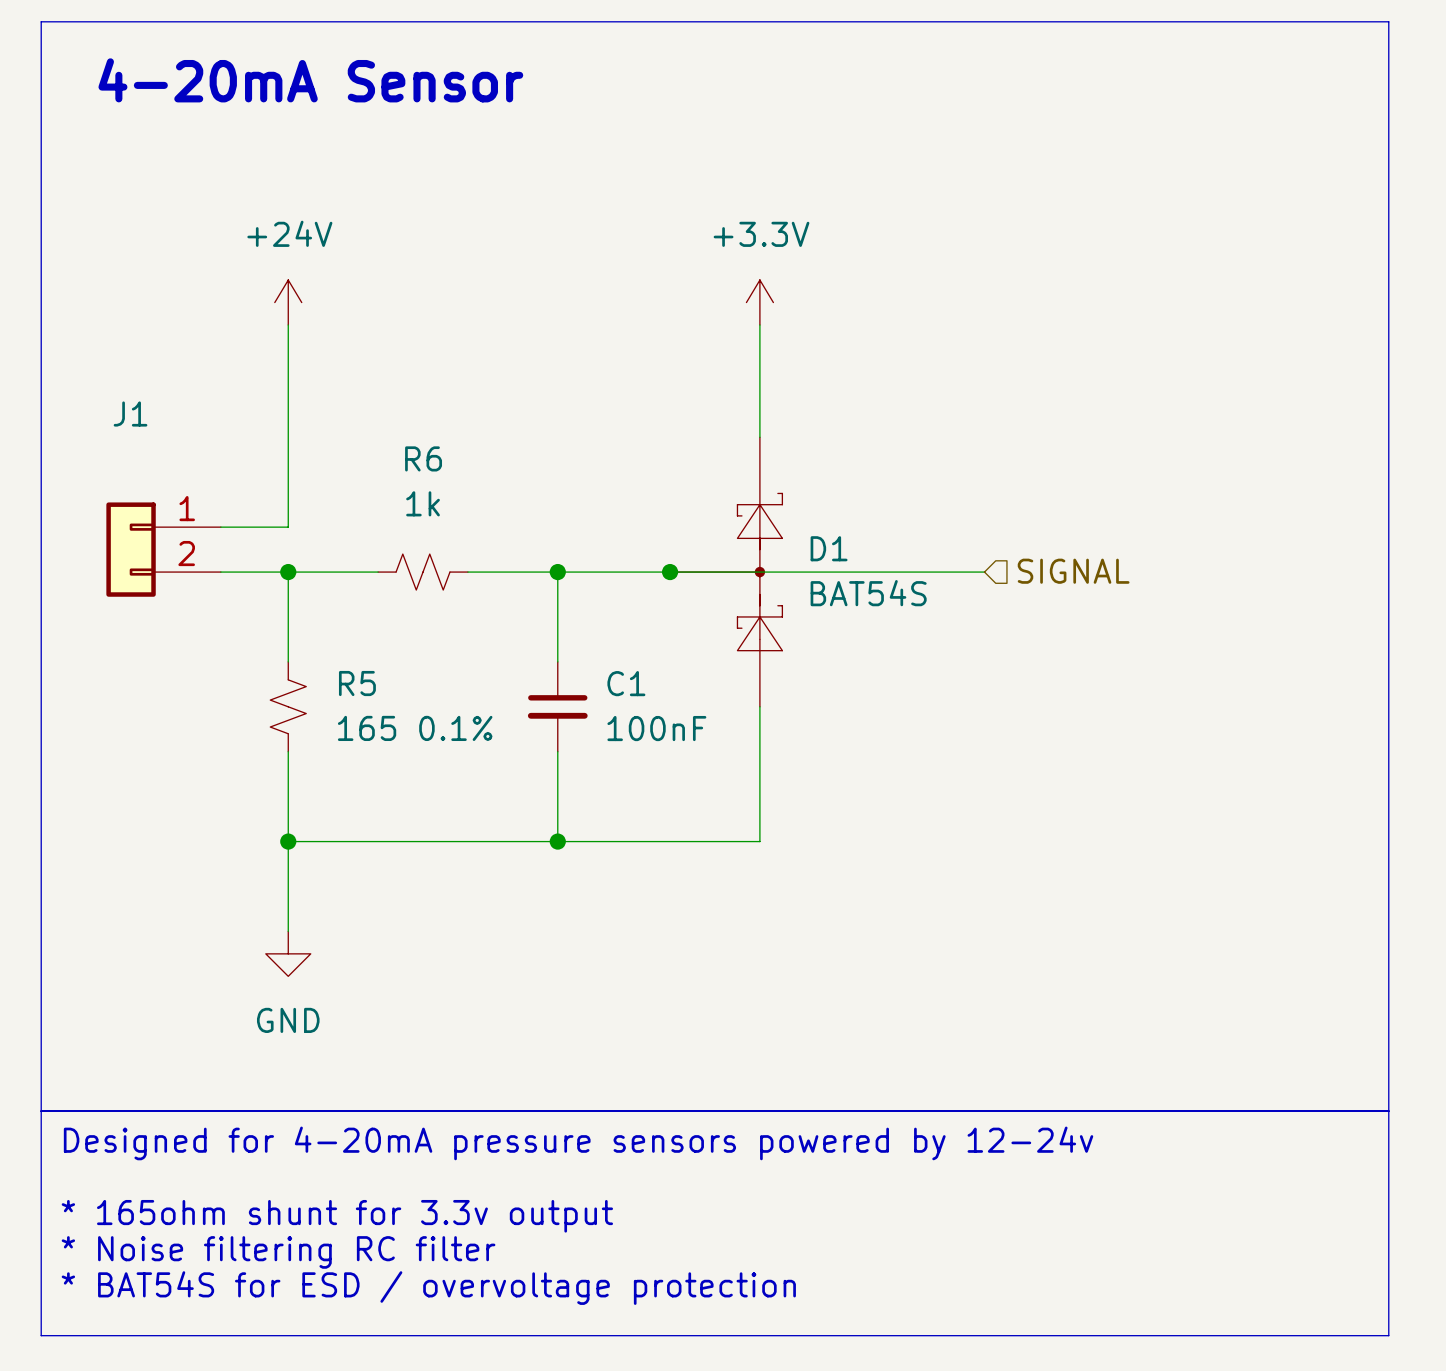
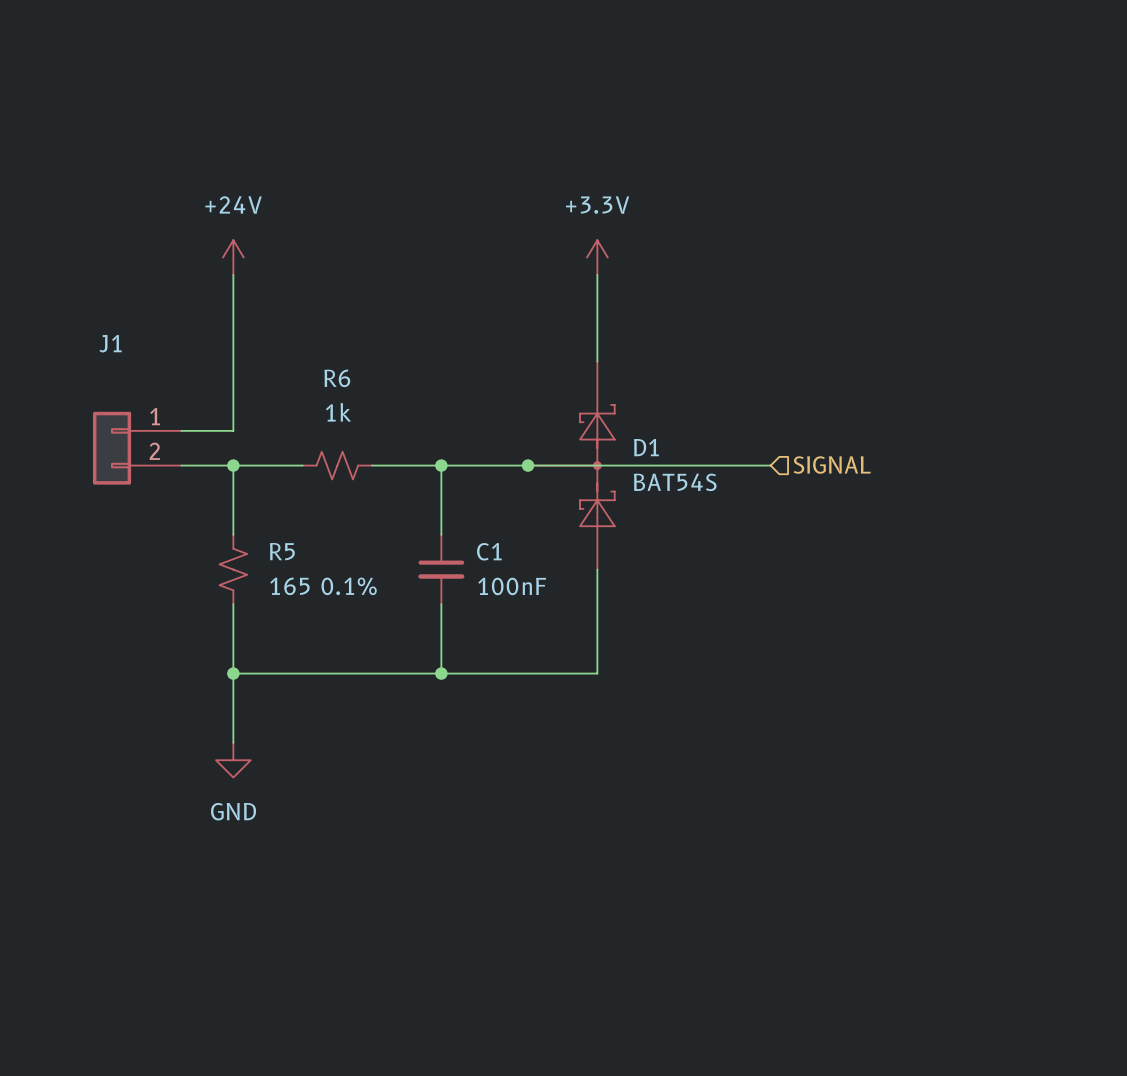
line: (41, 21) (1388, 21) (1388, 1335) (41, 1335) (41, 21) -> none
text: 4-20mA Sensor (310, 80) -> none
line: (41, 1111) (1388, 1111) -> none
text: Designed for 4-20mA pressure sensors powered by 12-24v (578, 1143) -> none
text: * 165ohm shunt for 3.3v output (337, 1216) -> none
text: * Noise filtering RC filter (278, 1252) -> none
text: * BAT54S for ESD / overvoltage protection (428, 1288) -> none

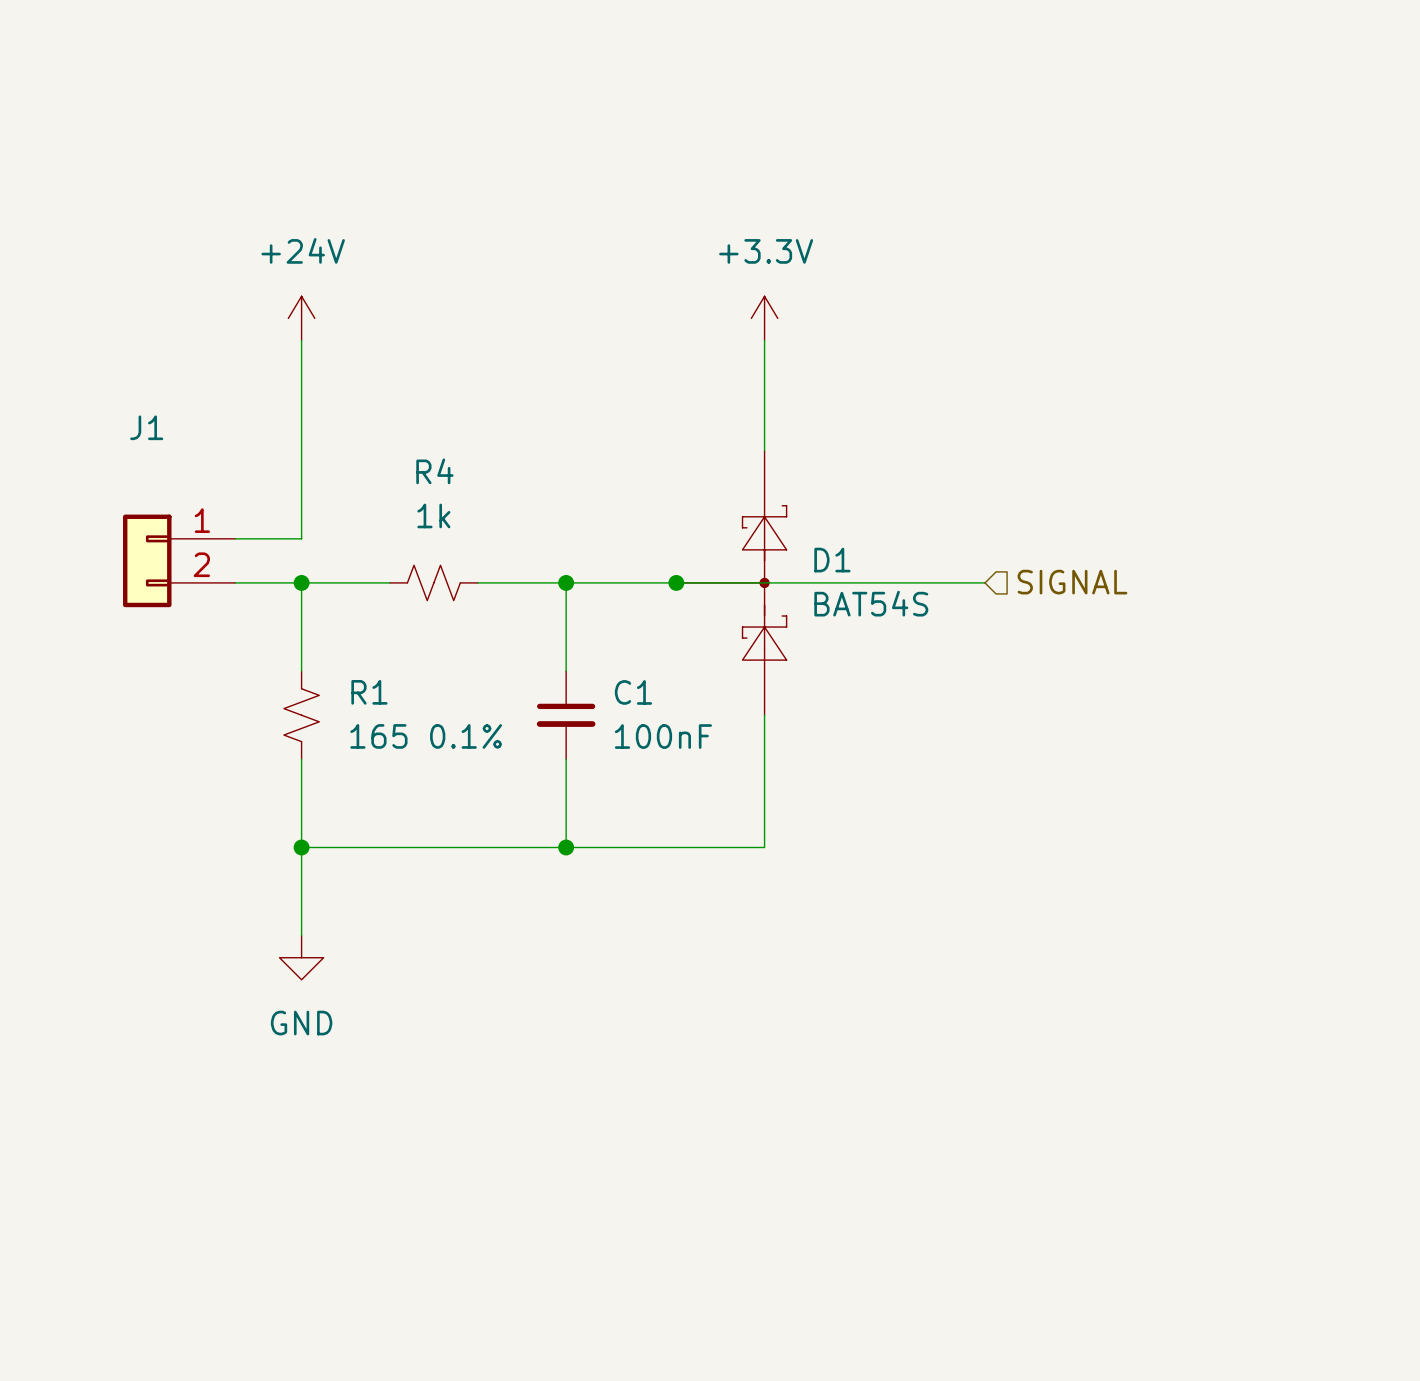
R6 name: R6 (337, 378) -> R4 (434, 471)
R5 name: R5 (282, 551) -> R1 (369, 692)

